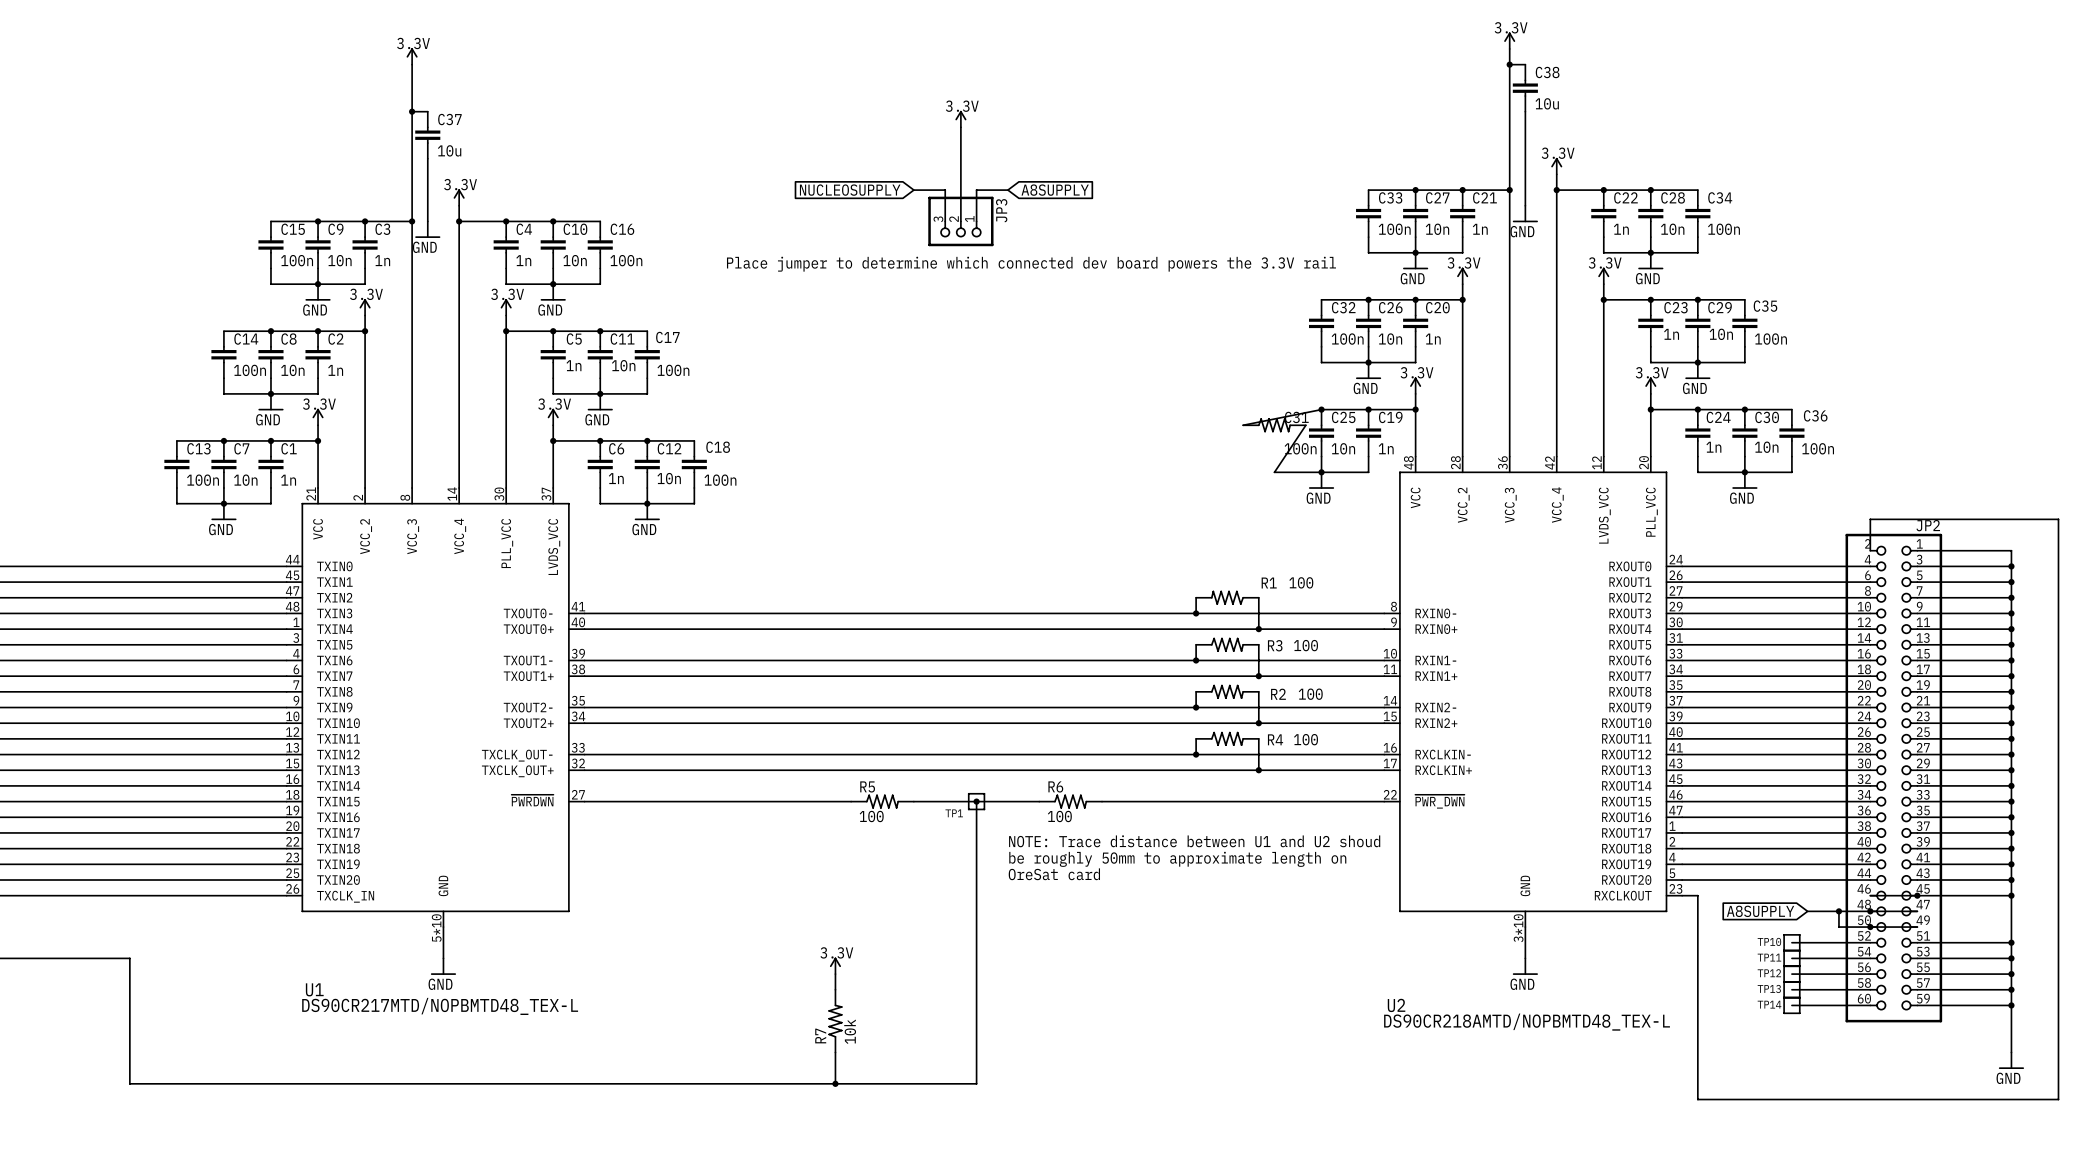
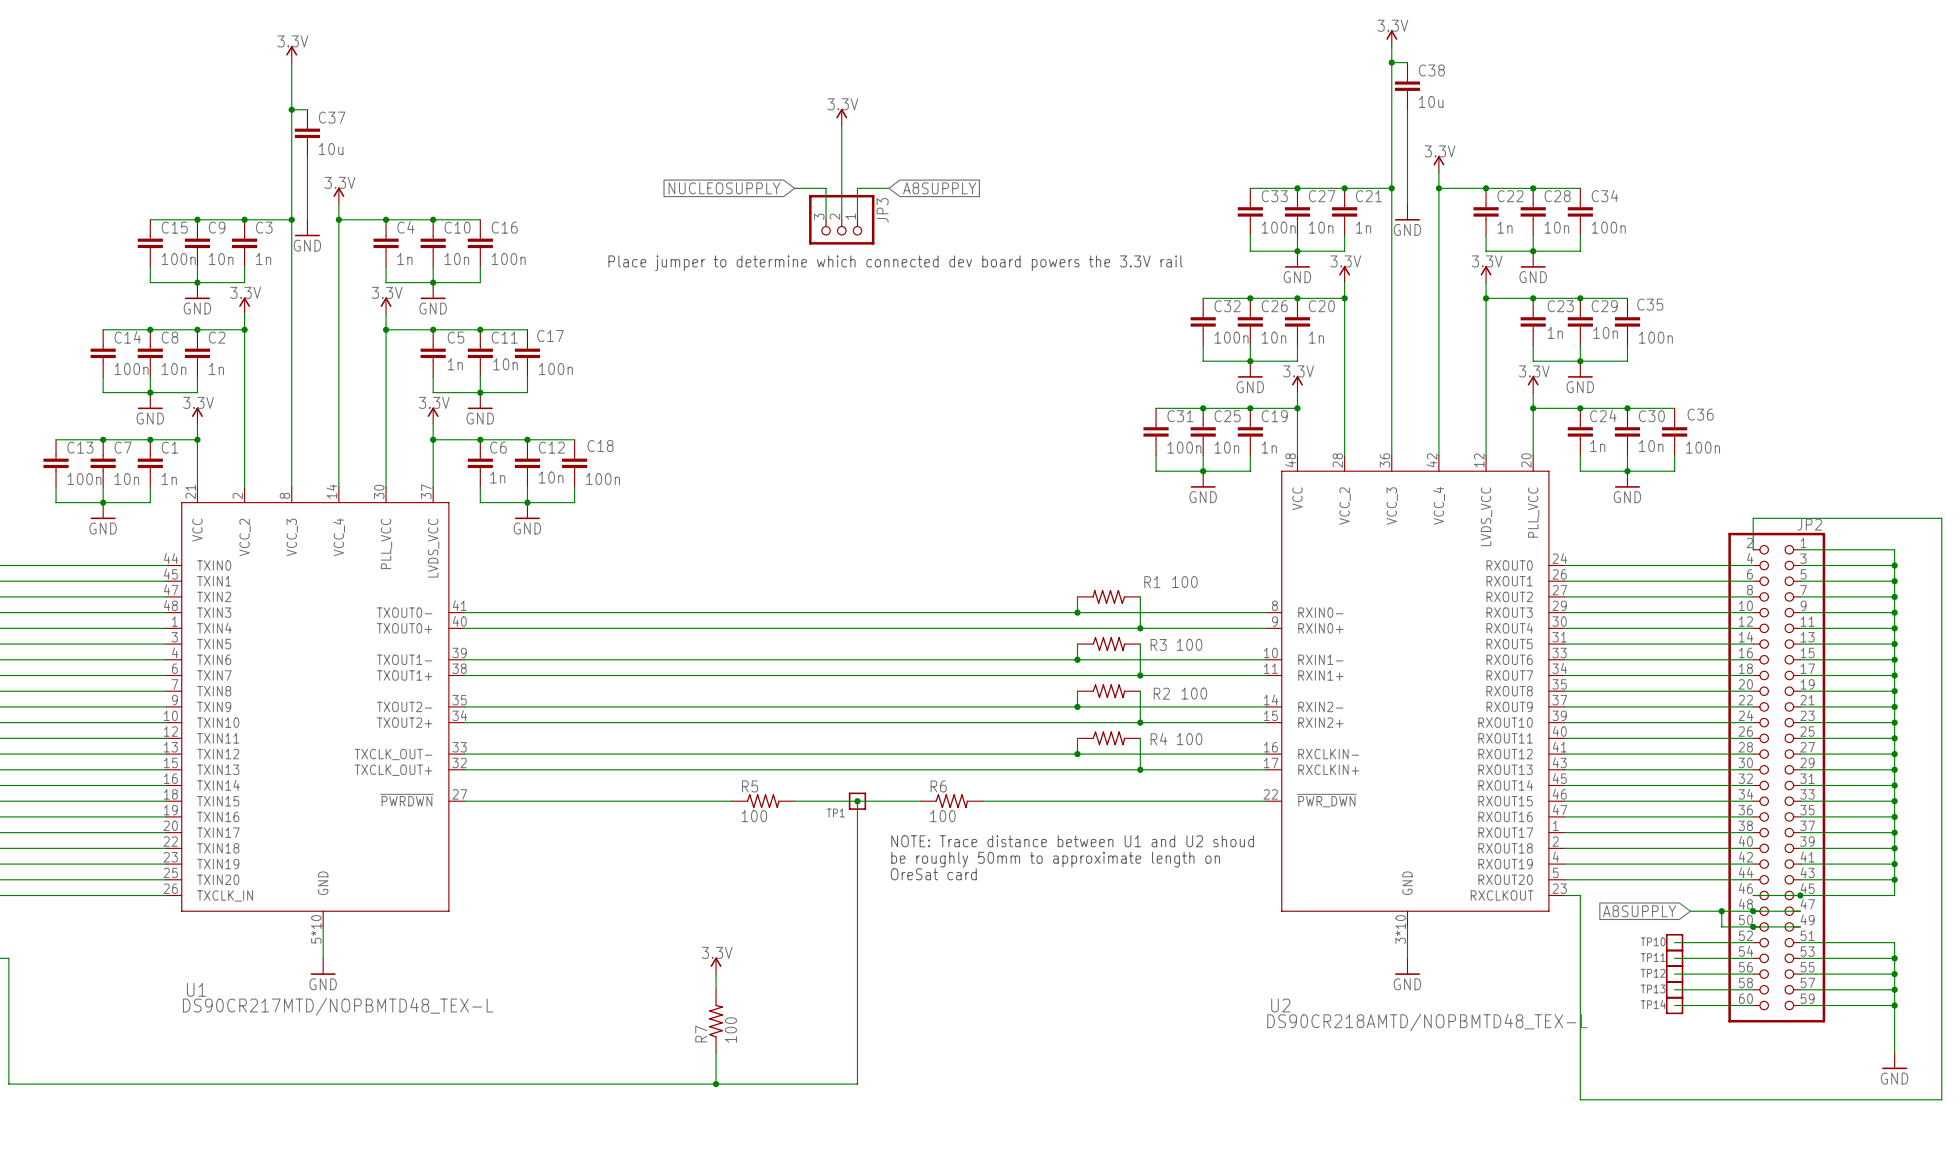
wire: (1321, 409) (1243, 425) -> (1203, 408) (1156, 408)
C31 symbol: [1243, 418, 1306, 433] -> [1143, 408, 1169, 456]
wire: (1305, 425) (1274, 472) -> (1156, 455) (1156, 471)
wire: (2011, 895) (2011, 942) -> none
junction: (2011, 895) -> none
junction: (2011, 942) -> none
R7 value: 10k (850, 1031) -> 100 (730, 1030)

